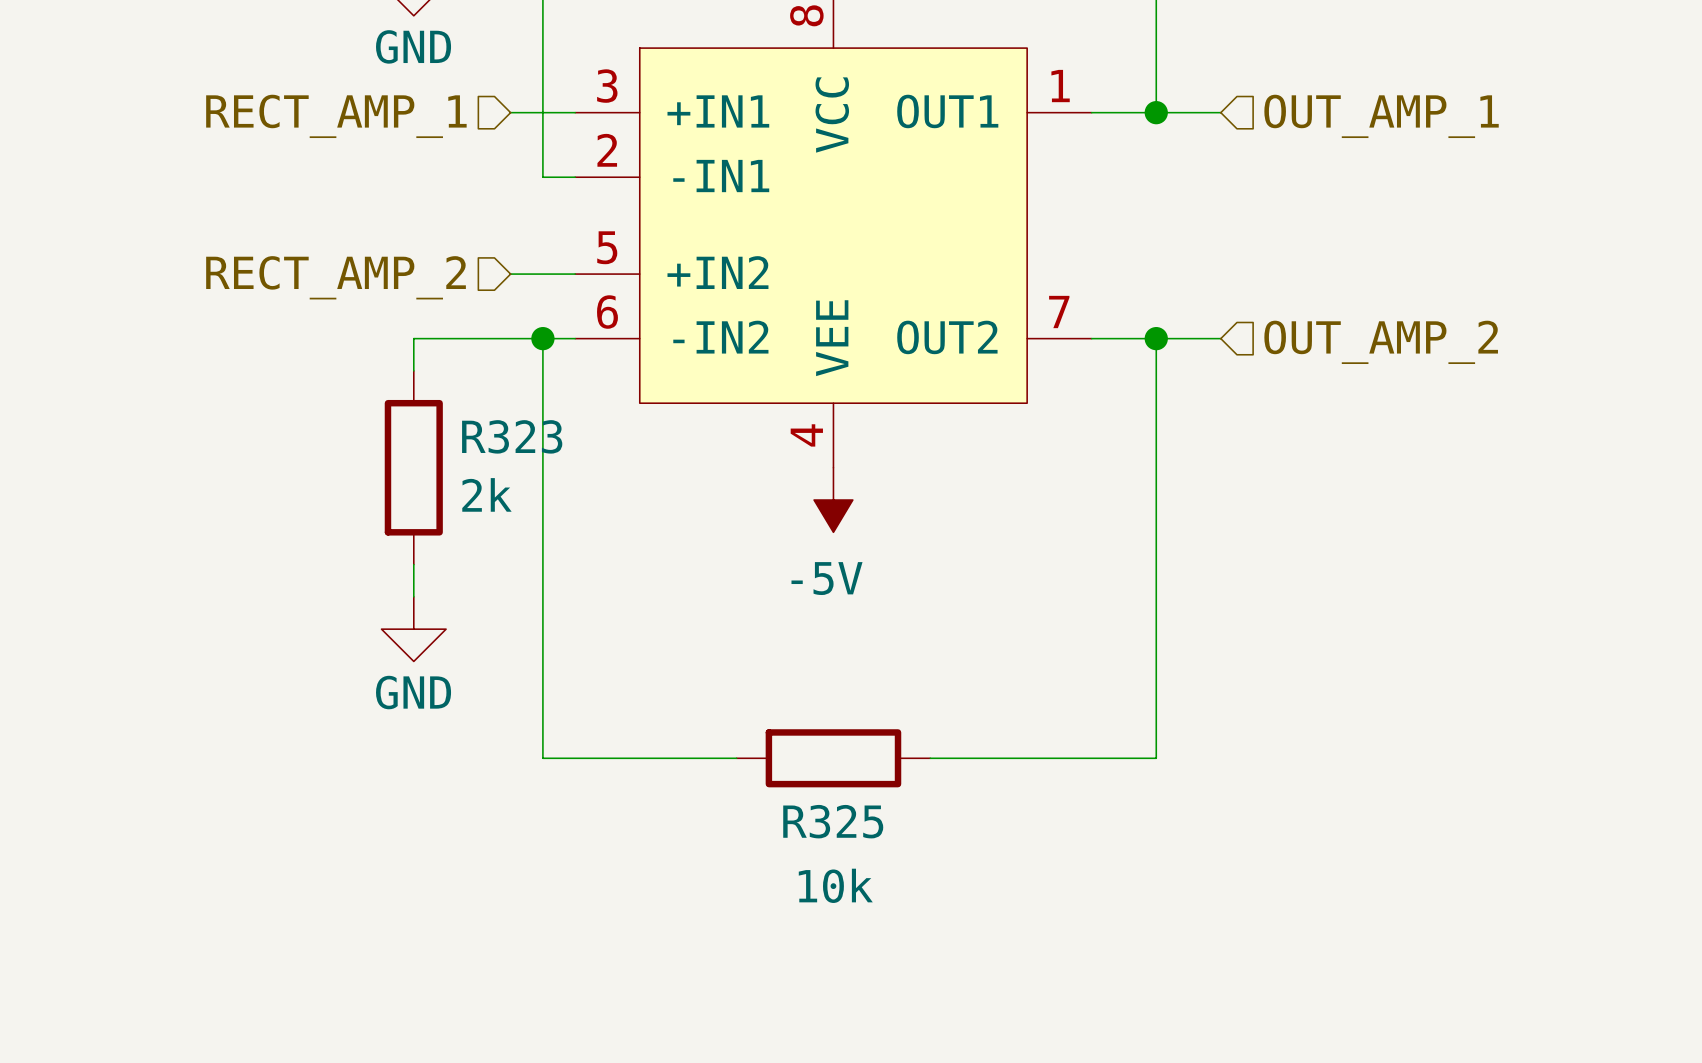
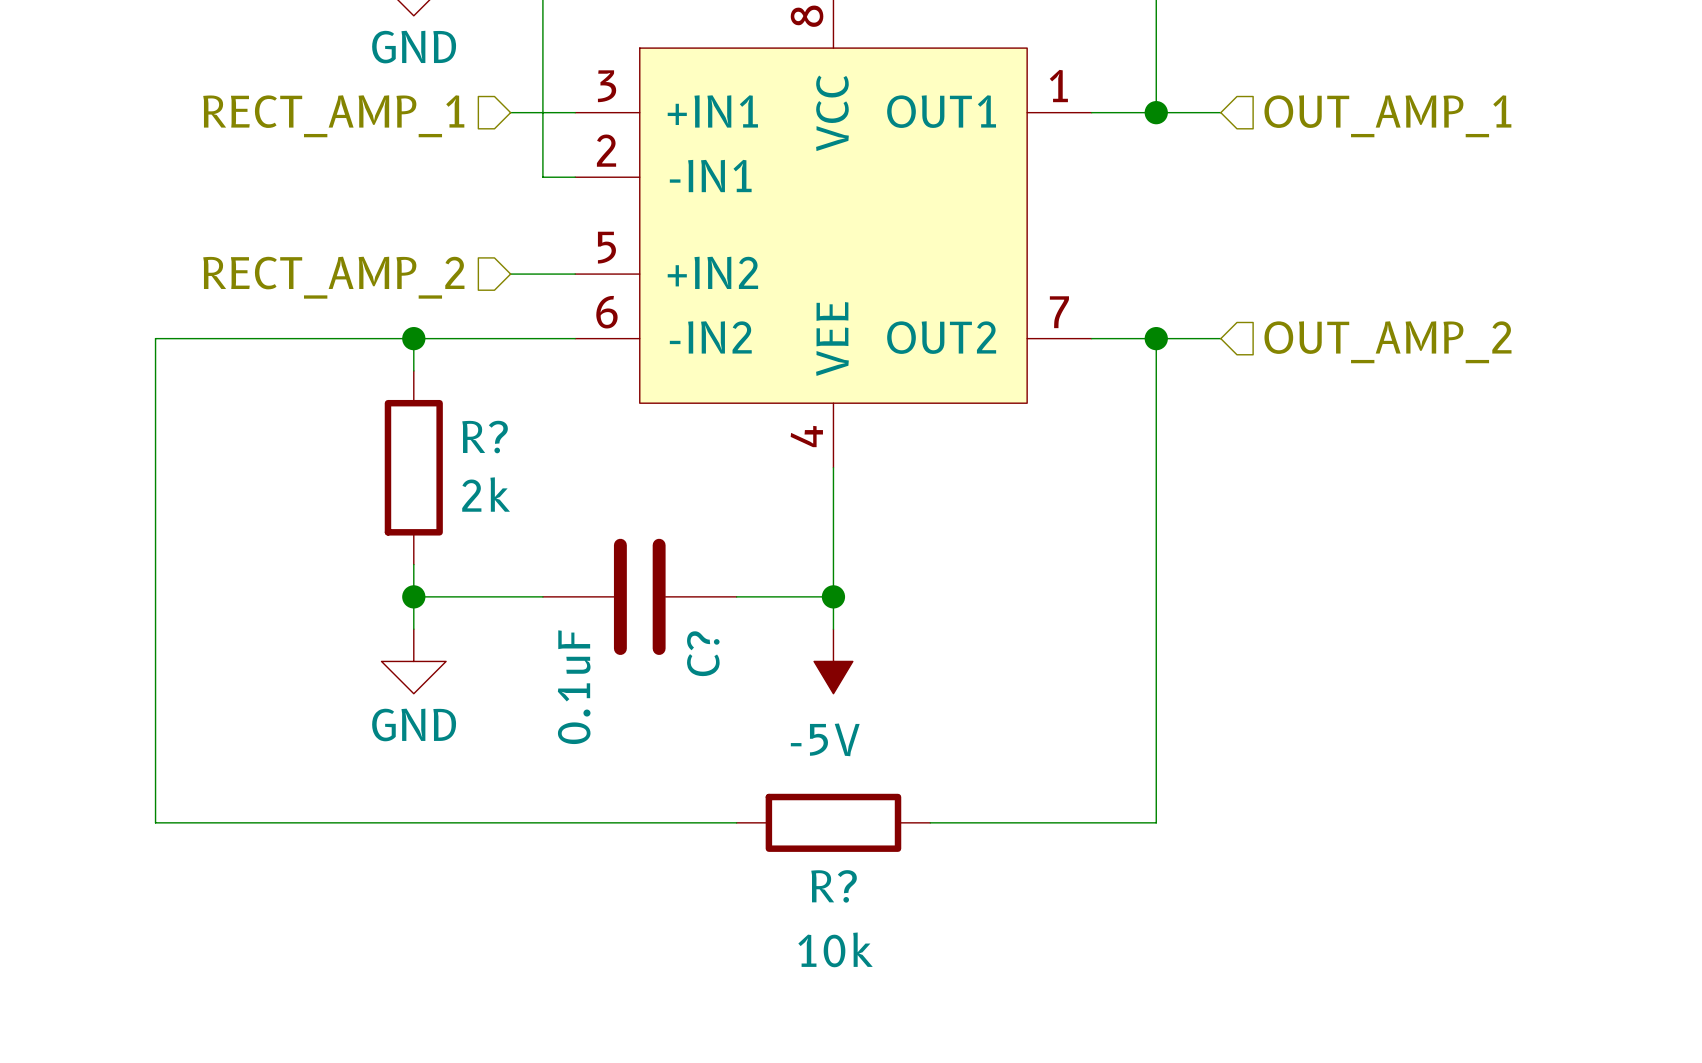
wire: none -> (413, 338) (155, 338) (155, 822) (736, 822)
wire: (542, 338) (542, 758) (736, 758) -> none
junction position: (542, 338) -> (413, 338)
R323 name: R323 (512, 436) -> R? (485, 437)
wire: none -> (833, 467) (833, 629)
power symbol position: -5V (833, 500) -> -5V (833, 661)
junction: none -> (413, 596)
wire: none -> (542, 596) (413, 596) (413, 629)
C?: none -> 0.1uF (639, 596)
wire: none -> (736, 596) (833, 596)
junction: none -> (833, 596)
power symbol position: GND (413, 629) -> GND (413, 661)
R325: 10k (833, 758) -> none
wire: (930, 758) (1156, 758) -> (930, 822) (1156, 822) (1156, 758)
R?: none -> 10k (833, 822)

